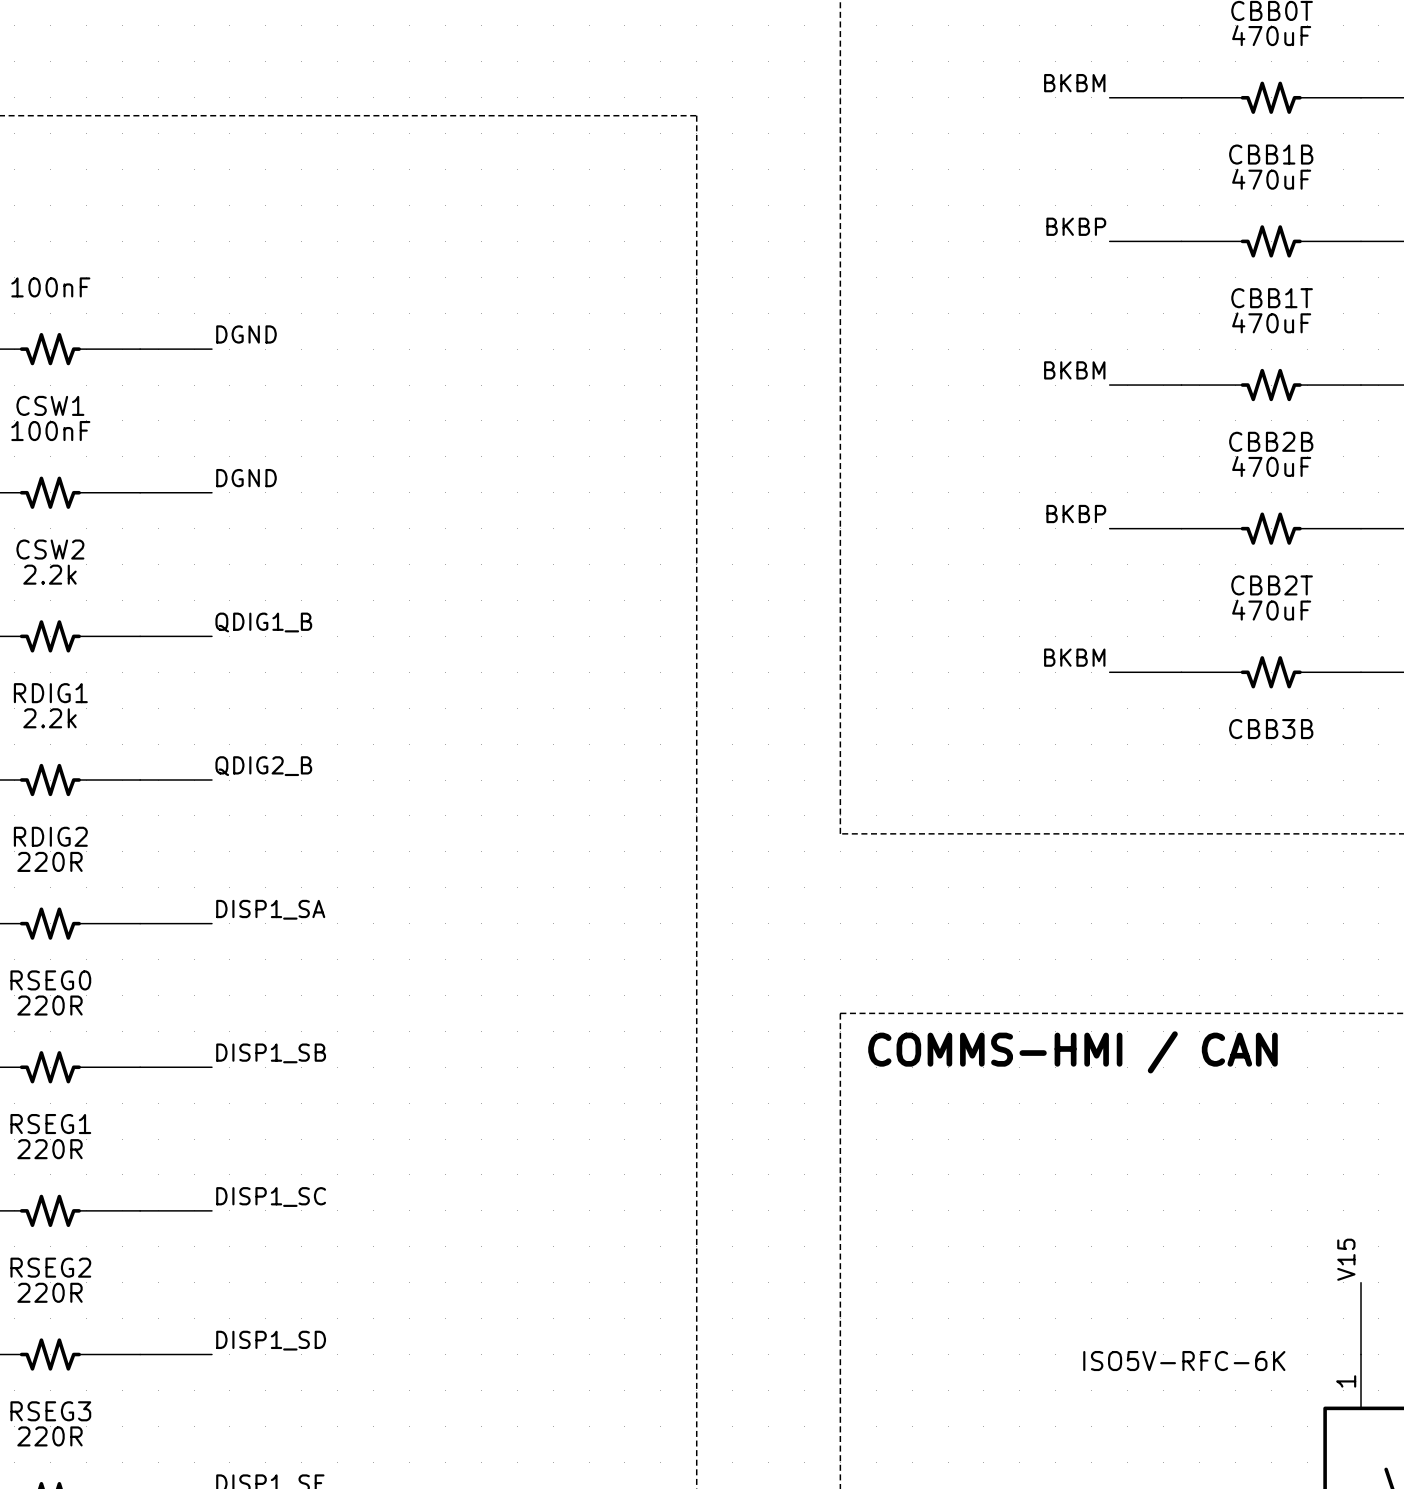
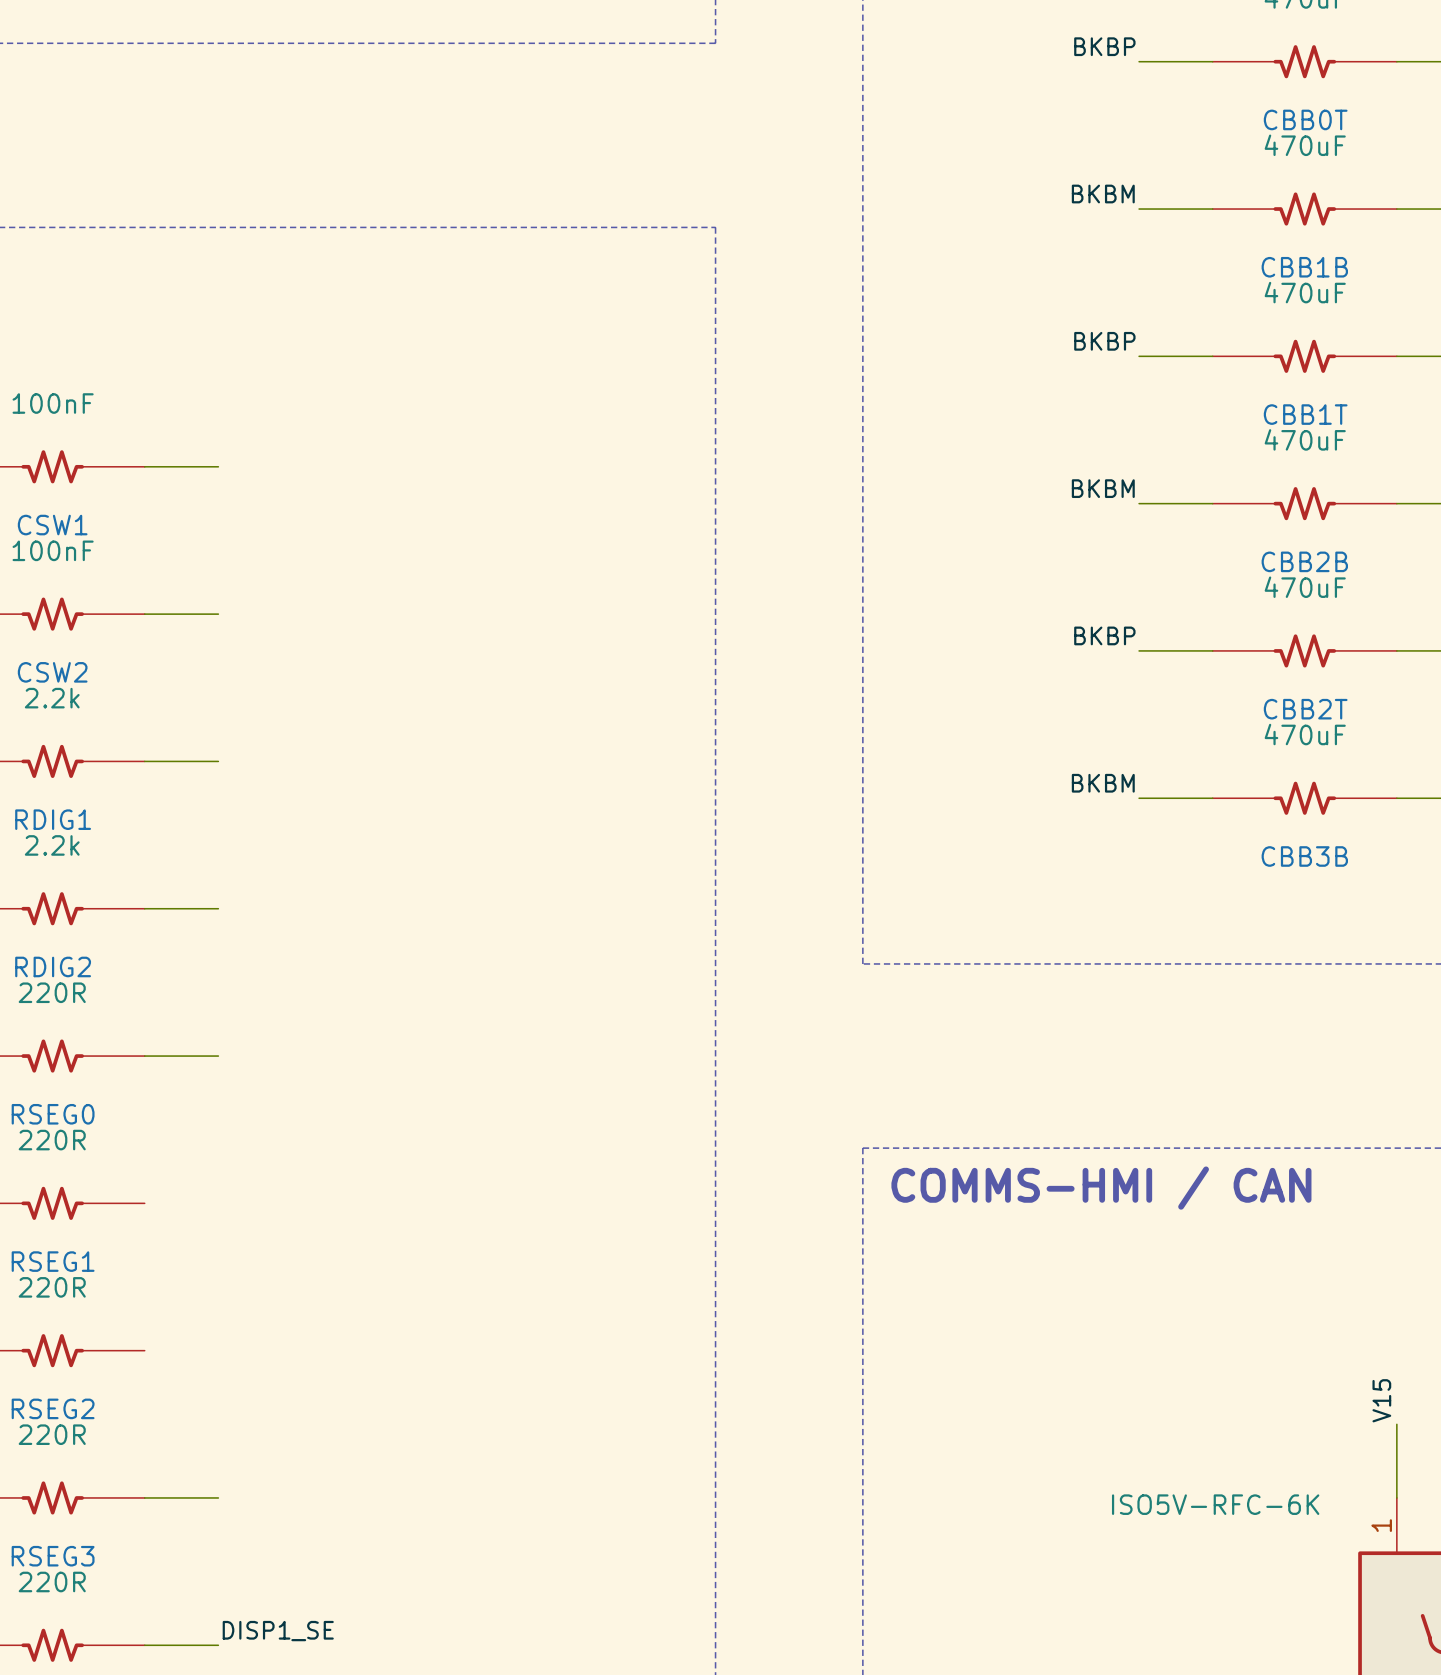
label: DGND (246, 334) -> none
label: DGND (246, 478) -> none
label: QDIG1_B (263, 622) -> none
label: QDIG2_B (263, 766) -> none
label: DISP1_SA (270, 909) -> none
label: DISP1_SB (271, 1053) -> none
wire: (140, 1067) (211, 1067) -> none
label: DISP1_SC (271, 1197) -> none
wire: (140, 1210) (211, 1210) -> none
label: DISP1_SD (271, 1340) -> none

